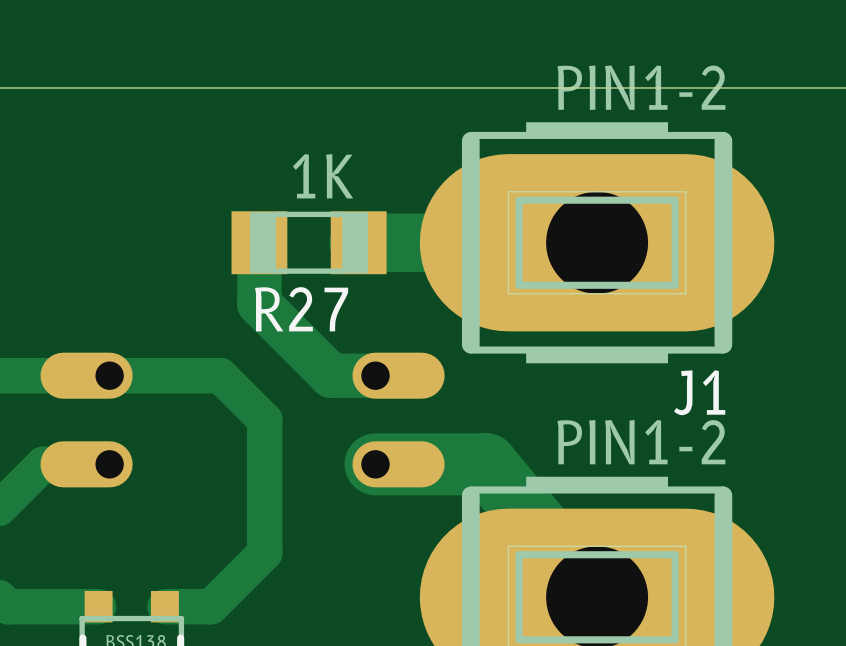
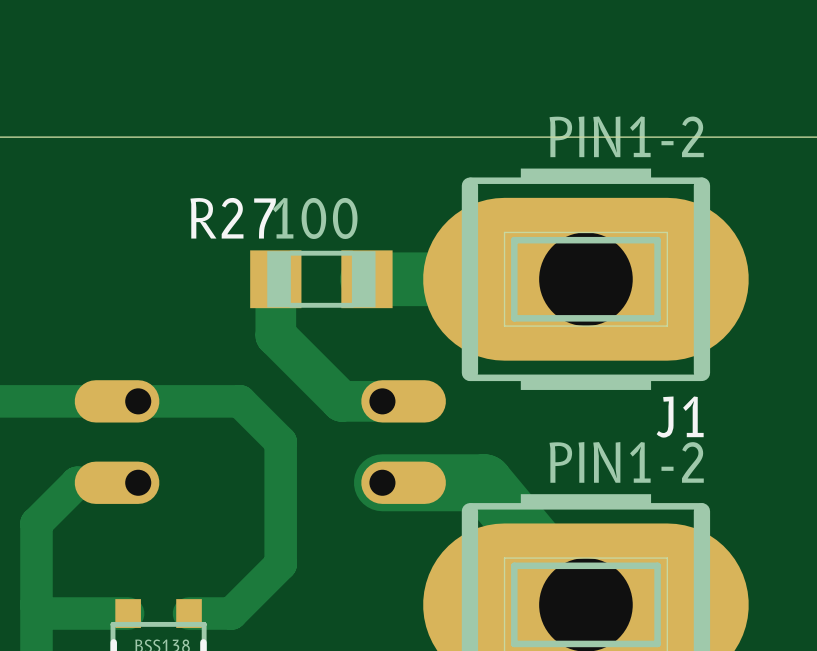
R27 value: 1K (323, 176) -> 100 (315, 218)
R27 name position: R27 (301, 309) -> R27 (233, 218)

